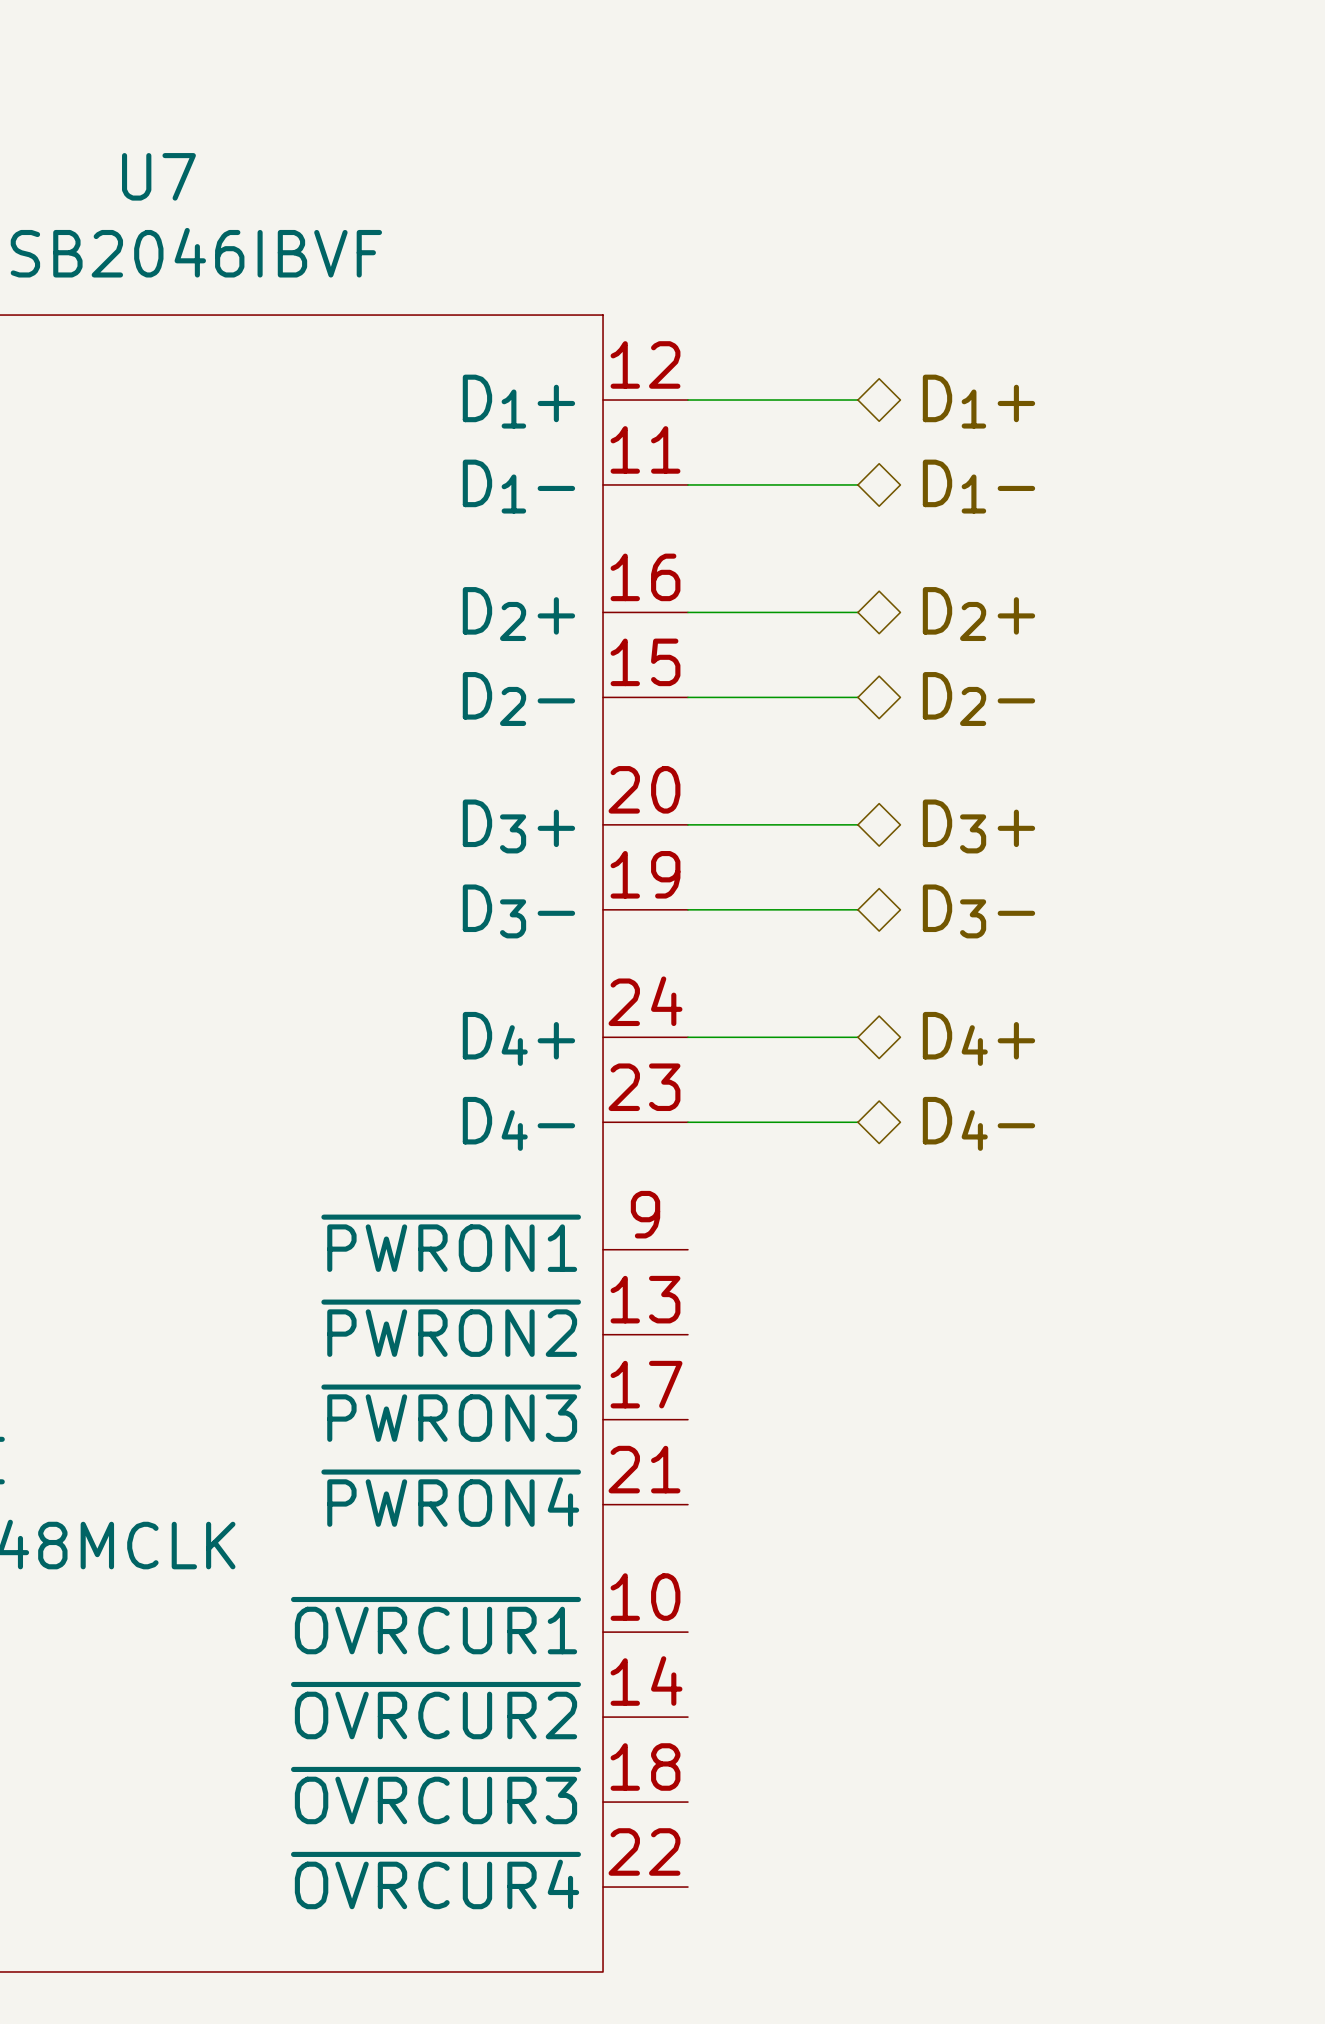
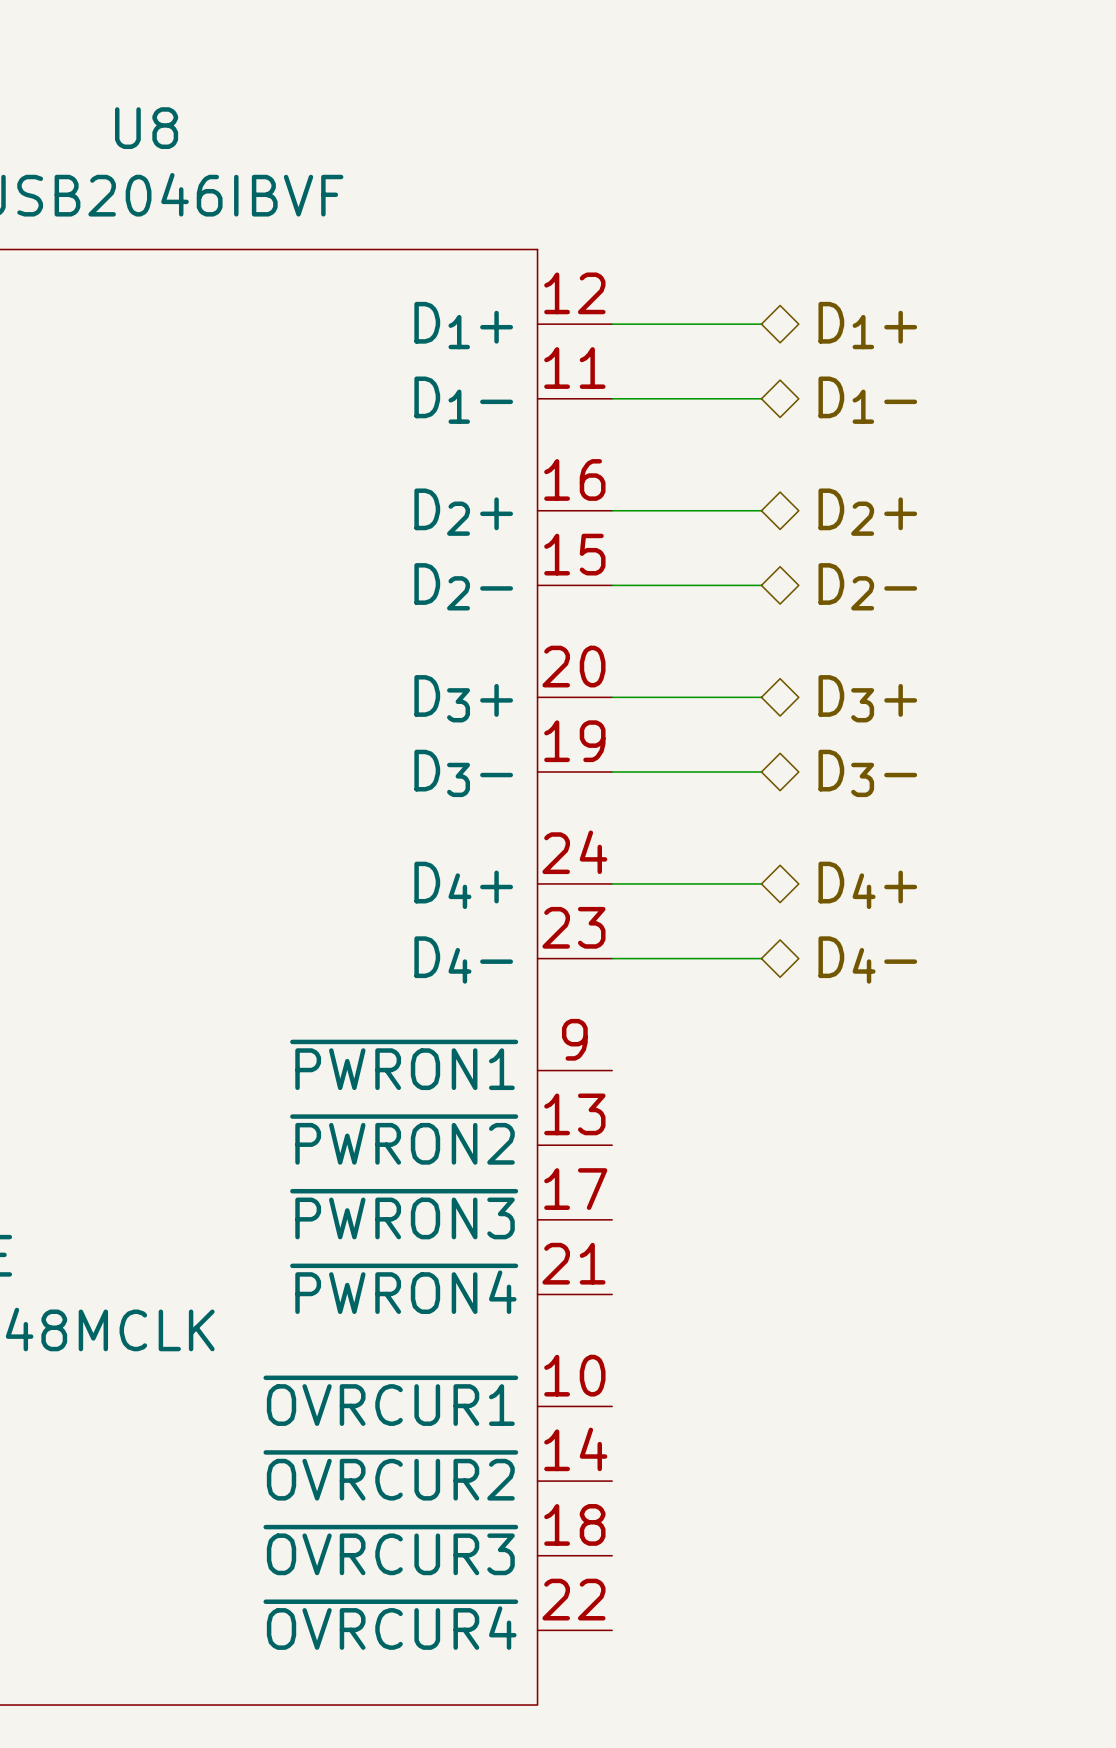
U7 name: U7 (158, 176) -> U8 (146, 128)

